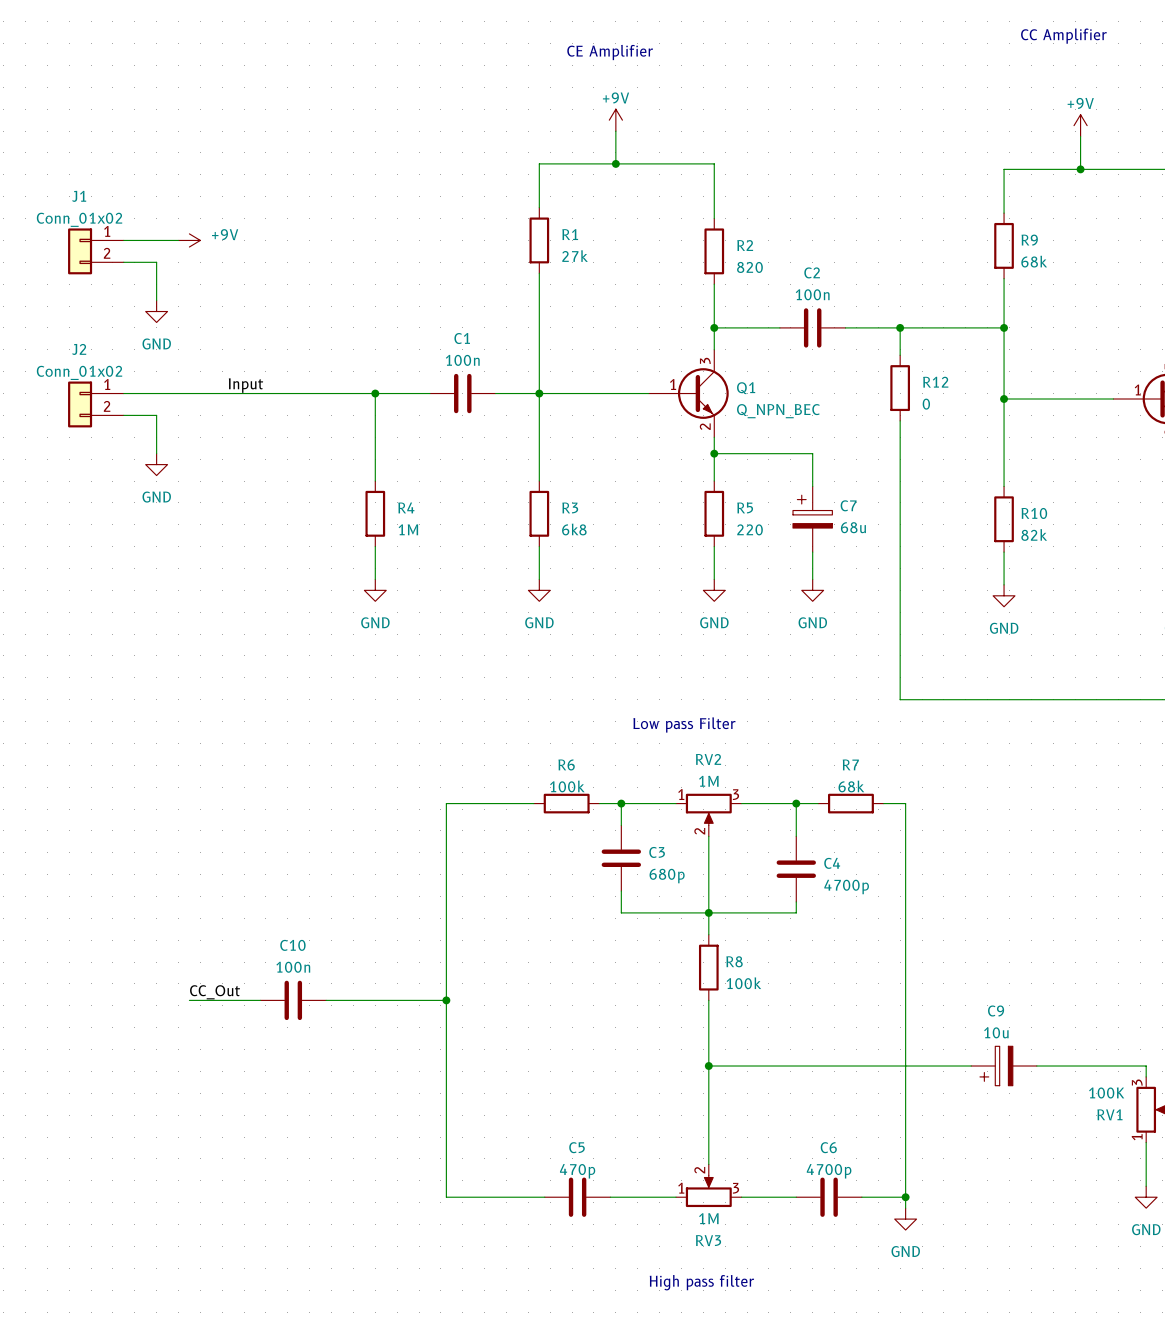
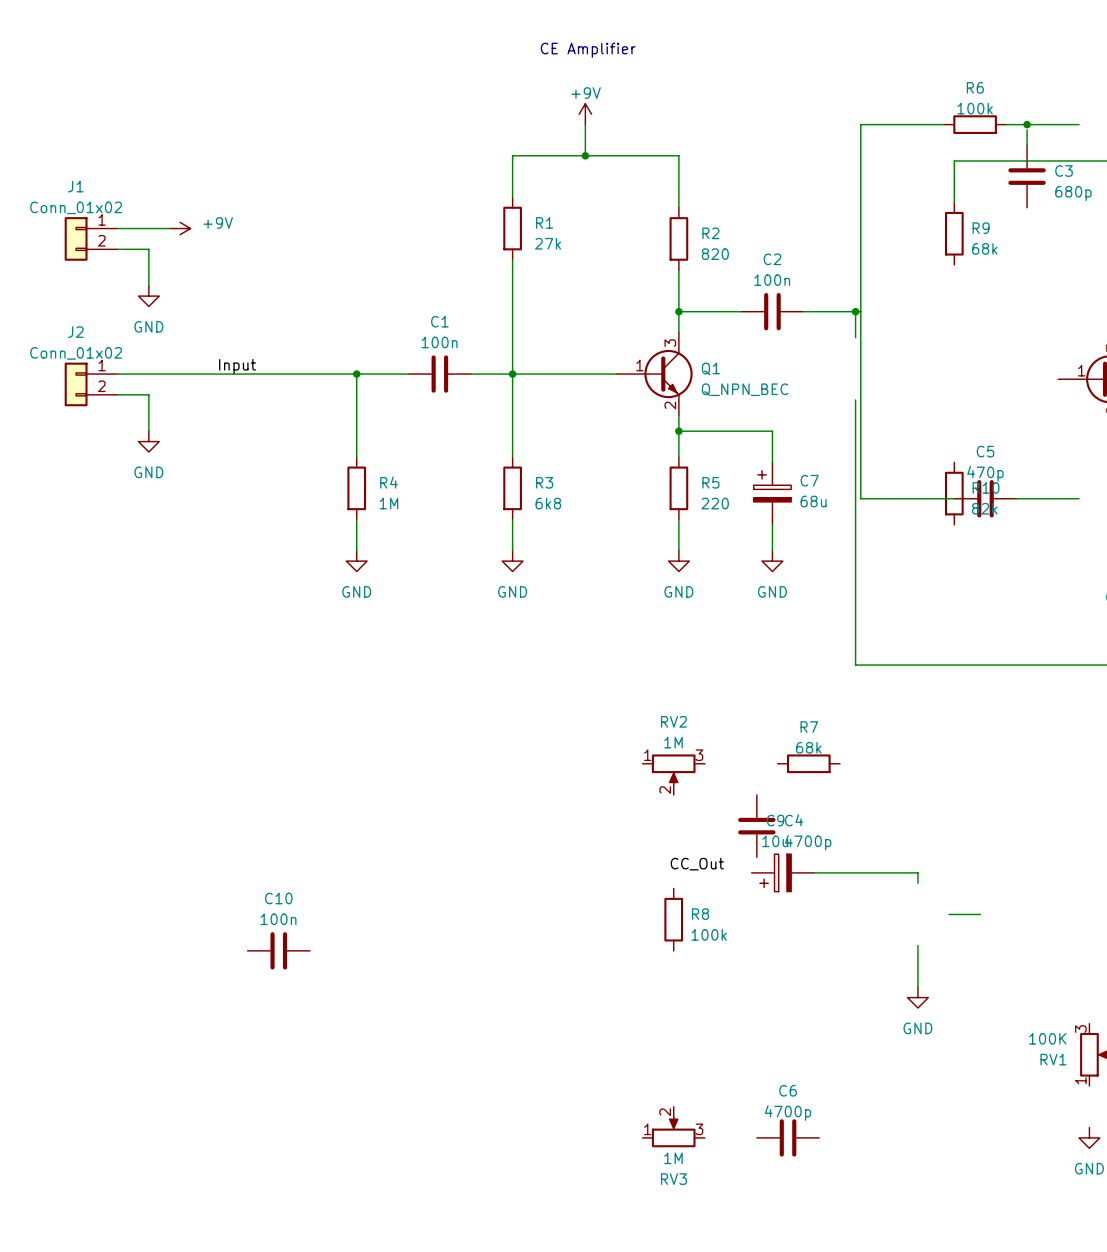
text: CC Amplifier (1063, 36) -> none
power symbol: +9V (1080, 125) -> none
wire: none -> (943, 124) (860, 124) (860, 498) (954, 498)
wire: none -> (1006, 124) (1079, 124)
junction position: (1080, 169) -> (1027, 124)
wire: (1004, 278) (1004, 486) -> none
wire: (905, 327) (1004, 327) -> none
junction: (1004, 327) -> none
R12: 0 (900, 388) -> none
wire: (1004, 399) (1113, 399) -> none
junction: (1004, 399) -> none
wire: none -> (1016, 498) (1079, 498)
wire: (1004, 552) (1004, 584) -> none
power symbol: GND (1004, 595) -> none
text: Low pass Filter (684, 724) -> none
wire: (533, 803) (446, 803) (446, 1197) (544, 1197) -> none
R6 position: (566, 803) -> (975, 124)
wire: (599, 803) (676, 803) -> none
wire: (621, 803) (621, 825) -> none
junction: (621, 803) -> none
wire: (741, 803) (818, 803) -> none
wire: (796, 803) (796, 836) -> none
junction: (796, 803) -> none
wire: (883, 803) (905, 803) (905, 1208) -> none
wire: (708, 836) (708, 934) -> none
C3 position: (621, 858) -> (1027, 176)
wire: (621, 891) (621, 912) (796, 912) (796, 901) -> none
label: none -> CC_Out (697, 864)
junction: (708, 912) -> none
wire: none -> (814, 872) (917, 872) (917, 883)
wire: none -> (949, 914) (980, 914)
label: CC_Out (215, 992) -> none
wire: none -> (917, 945) (917, 987)
wire: (189, 1000) (260, 1000) -> none
wire: (326, 1000) (446, 1000) -> none
junction: (446, 1000) -> none
wire: (708, 1000) (708, 1164) -> none
wire: (708, 1066) (971, 1066) -> none
junction: (708, 1066) -> none
C9 position: (1004, 1066) -> (782, 872)
wire: (1036, 1066) (1146, 1066) (1146, 1076) -> none
wire: (1146, 1142) (1146, 1186) -> none
C5 position: (577, 1197) -> (985, 498)
wire: (610, 1197) (676, 1197) -> none
wire: (741, 1197) (796, 1197) -> none
wire: (861, 1197) (905, 1197) -> none
junction: (905, 1197) -> none
power symbol position: GND (905, 1219) -> GND (917, 997)
text: High pass filter (701, 1282) -> none

